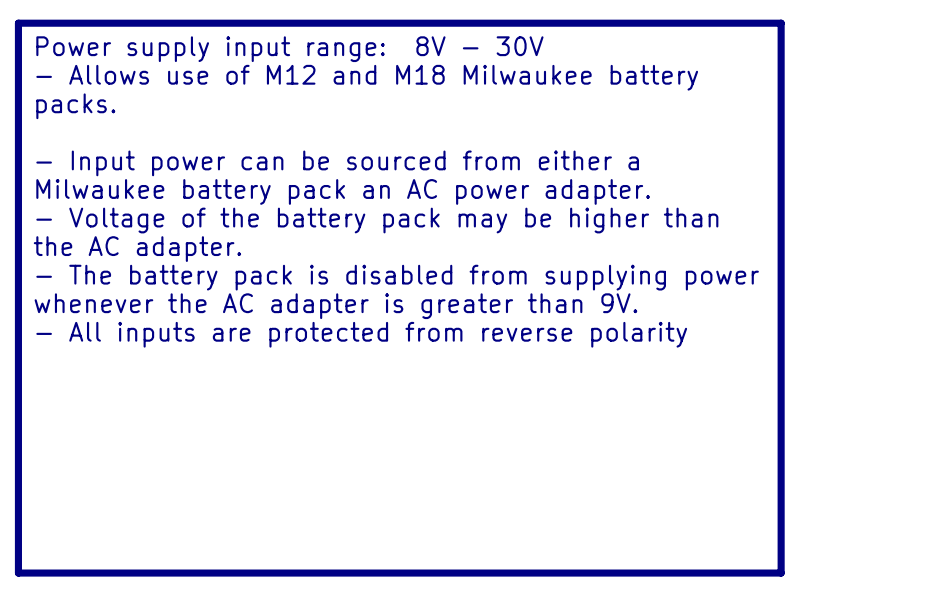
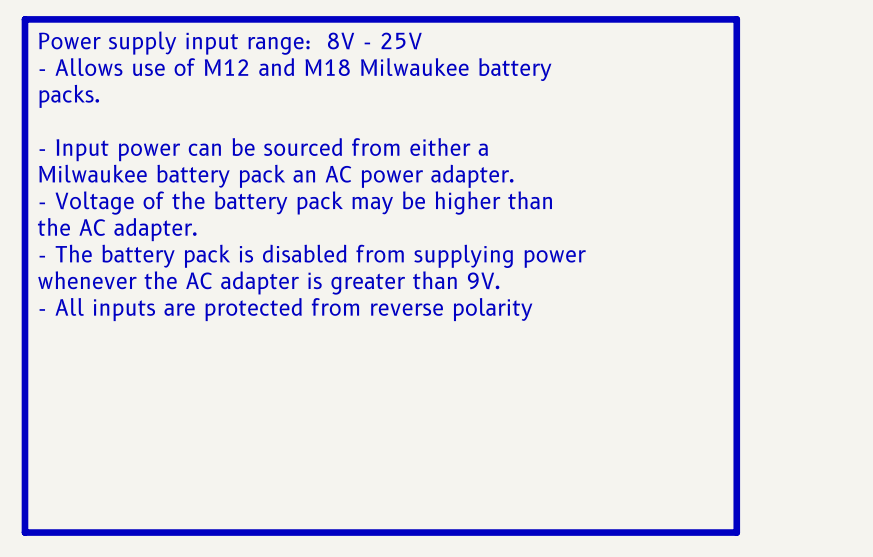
text: Power supply input range: 8V - 30V (289, 49) -> Power supply input range: 8V - 25V (230, 43)

